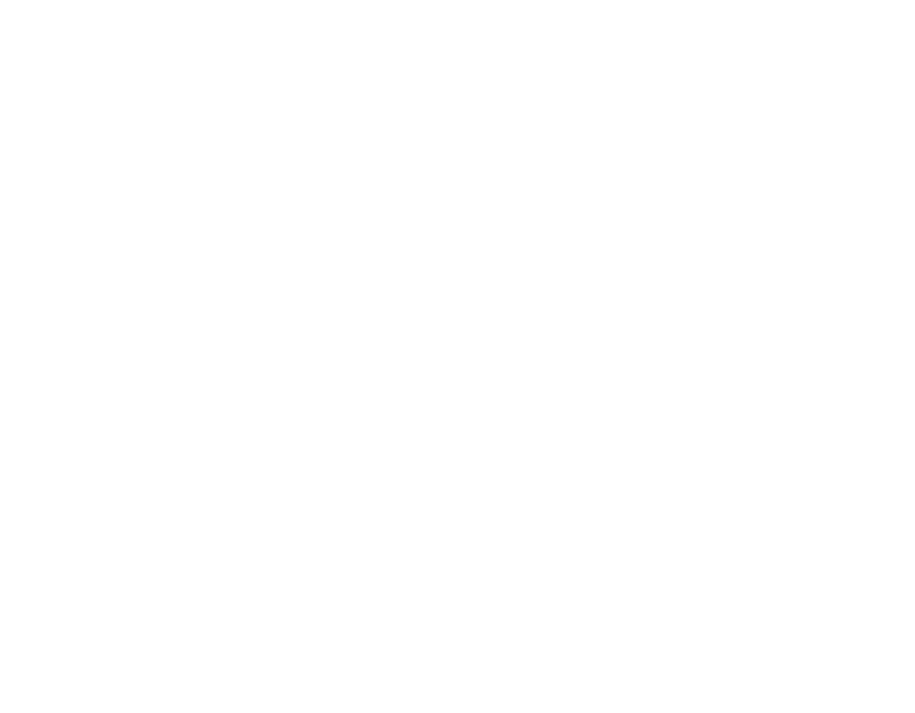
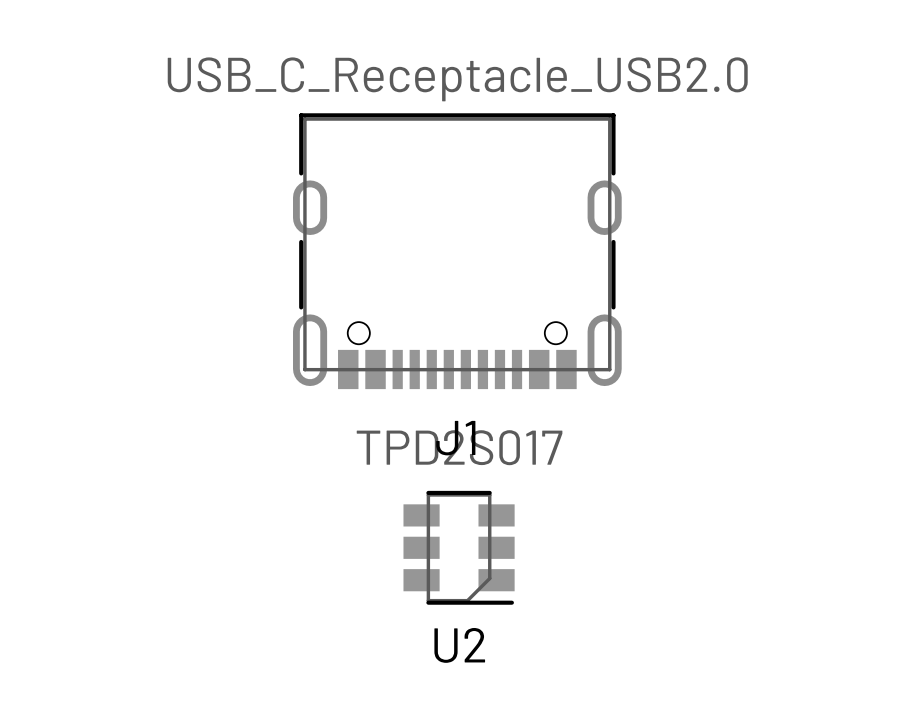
J1: none -> USB_C_Receptacle_USB2.0 (457, 251)
U2: none -> TPD2S017 (459, 547)

